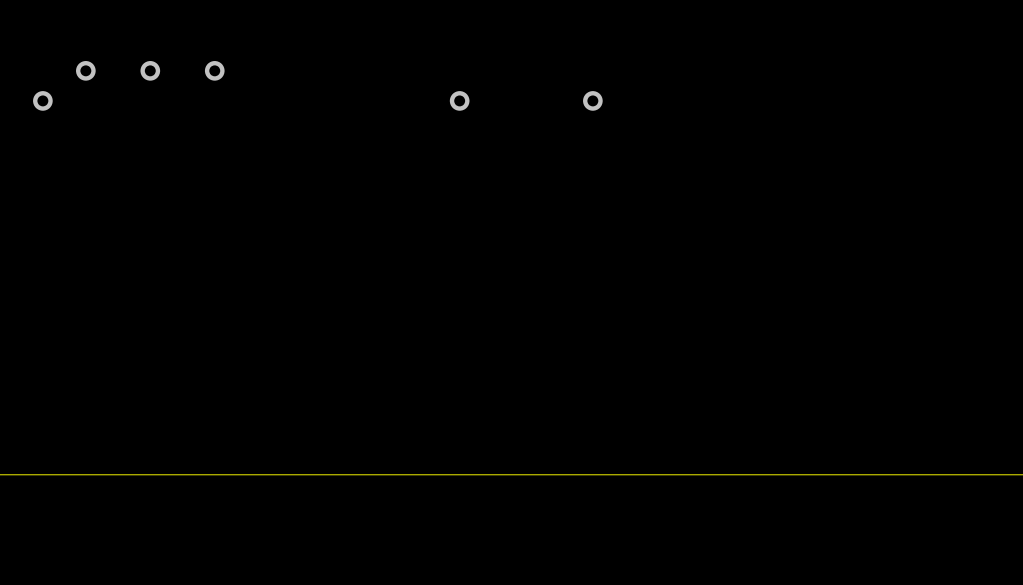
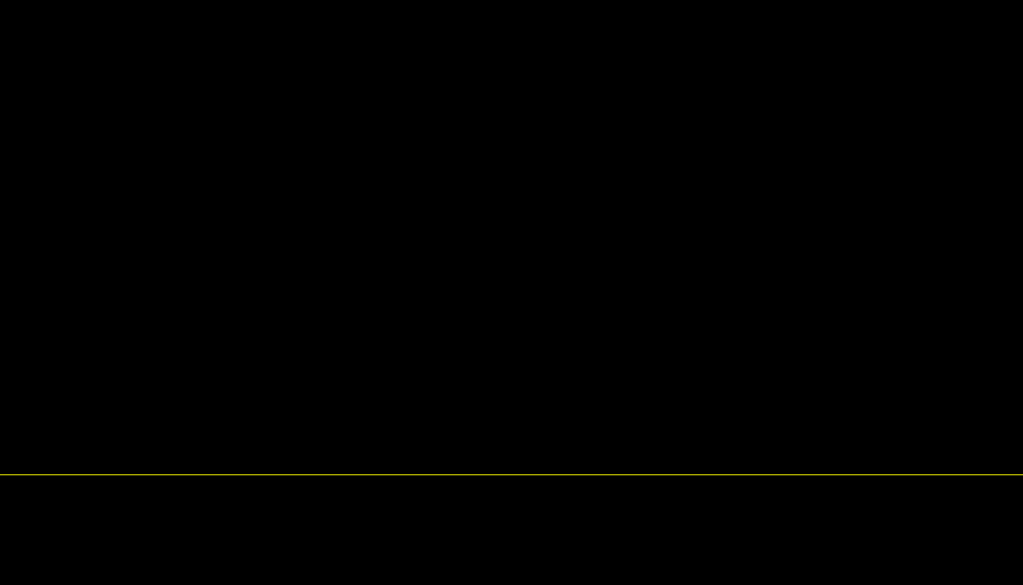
via: (85, 70) -> none
via: (150, 70) -> none
via: (214, 70) -> none
via: (42, 100) -> none
via: (459, 100) -> none
via: (592, 100) -> none

